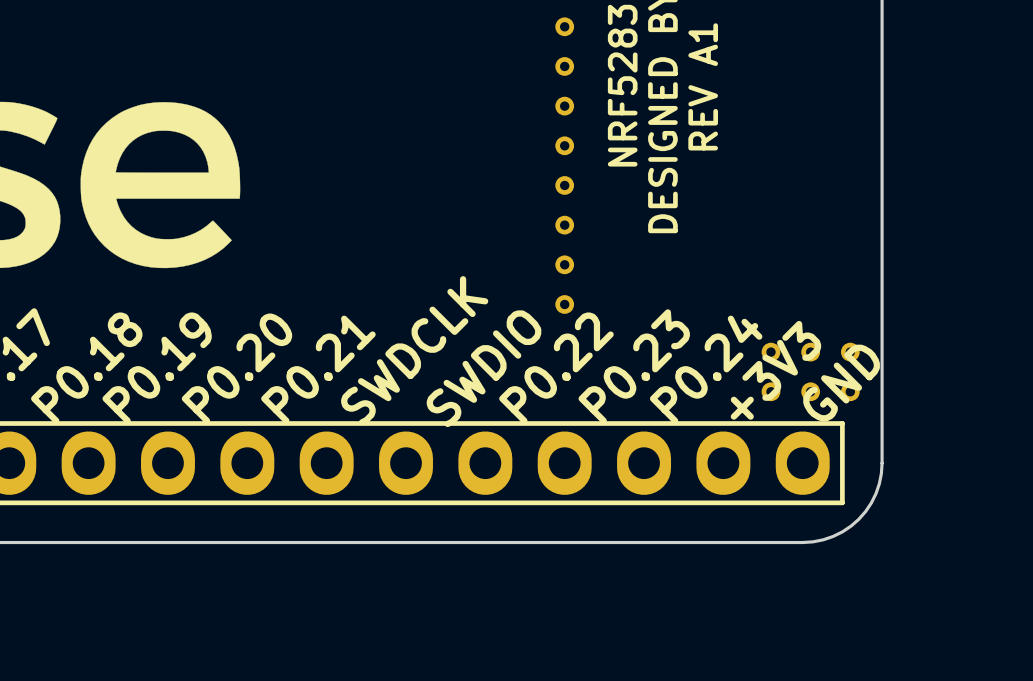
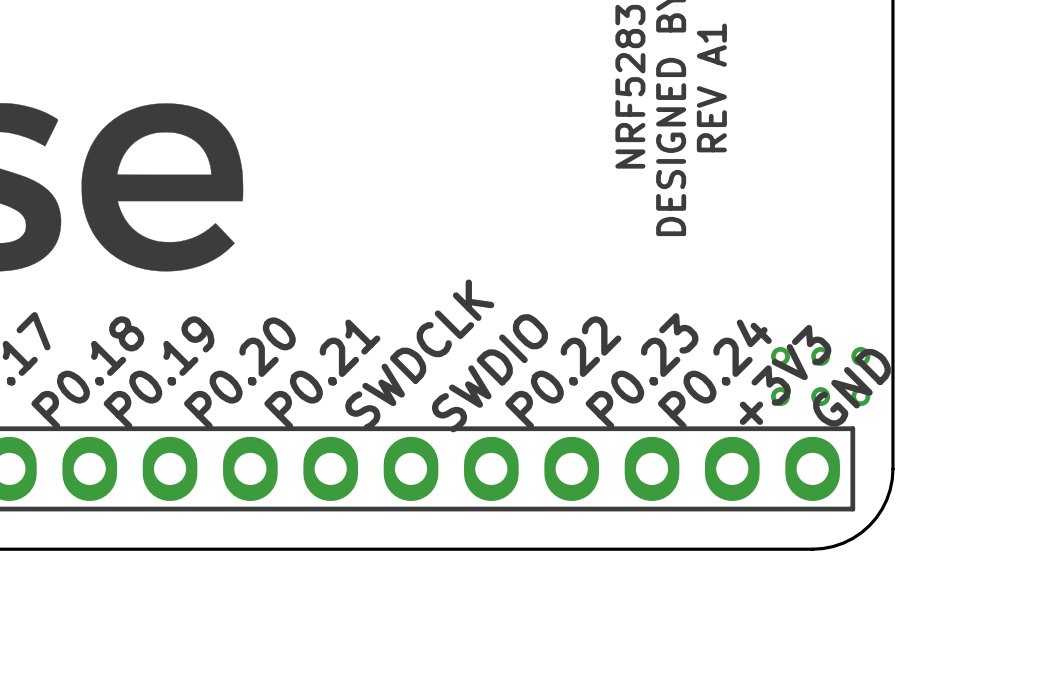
part: (564, 26) -> none
part: (564, 66) -> none
part: (564, 106) -> none
part: (564, 145) -> none
part: (564, 185) -> none
part: (564, 225) -> none
part: (564, 264) -> none
part: (564, 304) -> none

